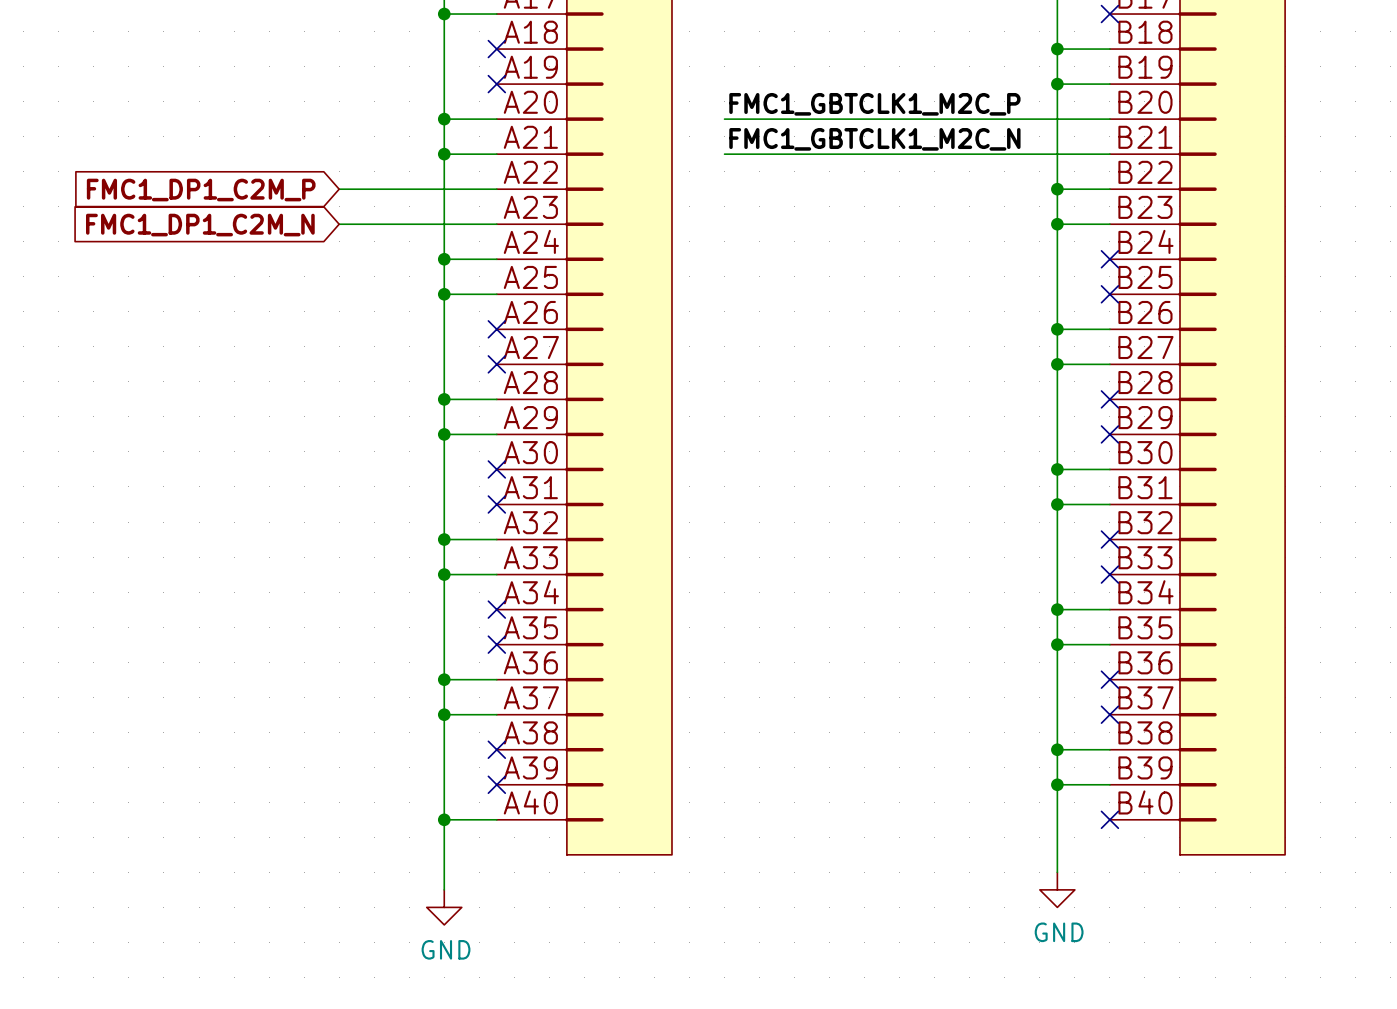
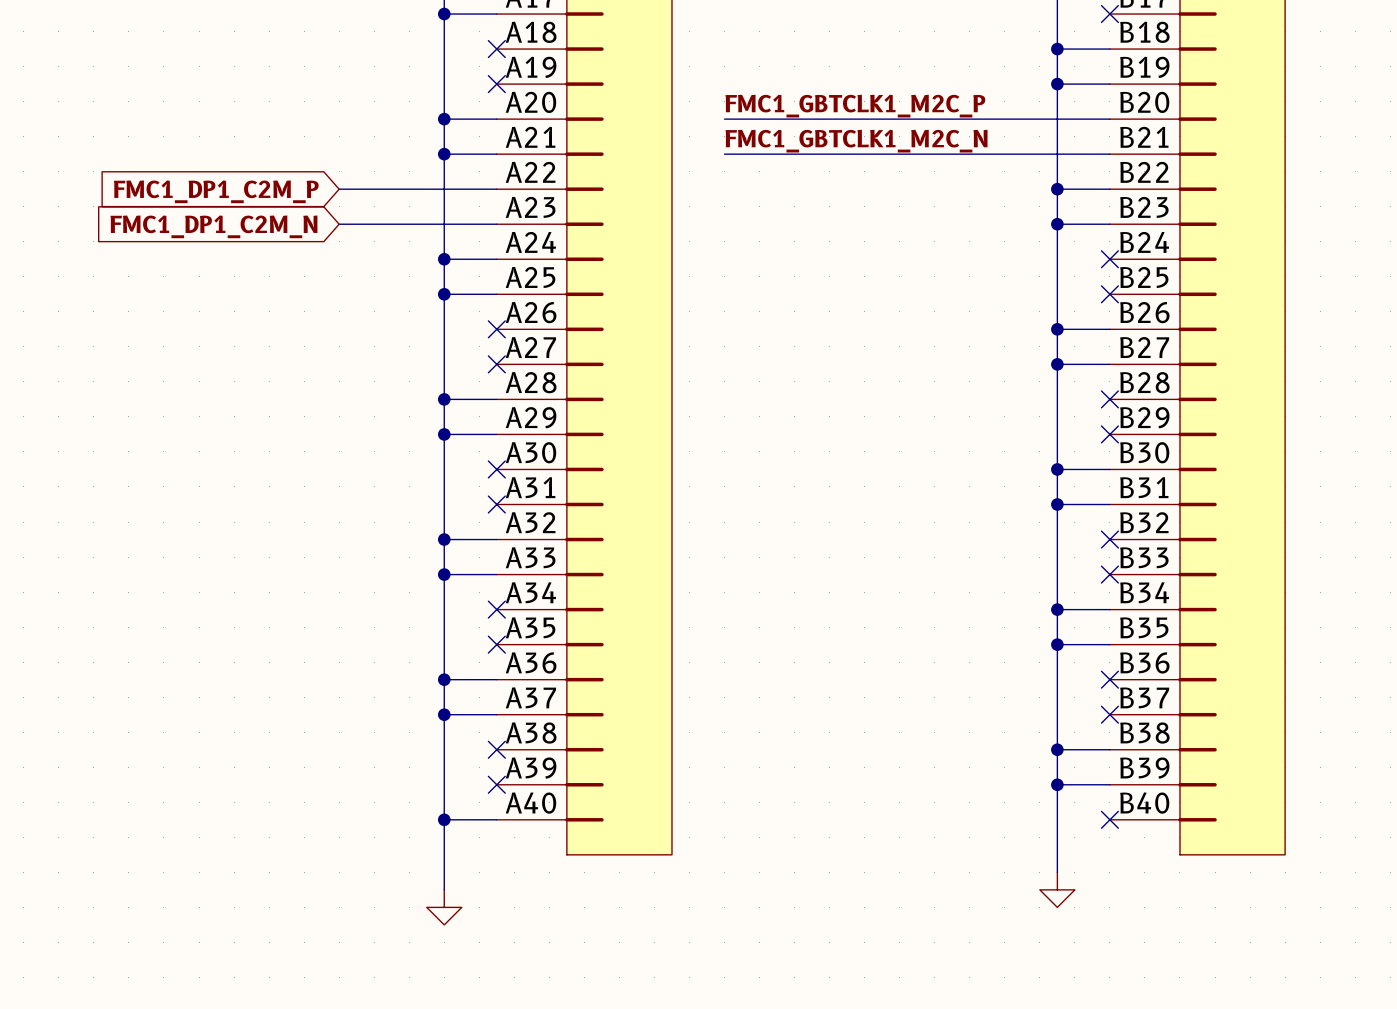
power symbol text: GND (1059, 932) -> none
power symbol text: GND (446, 949) -> none

